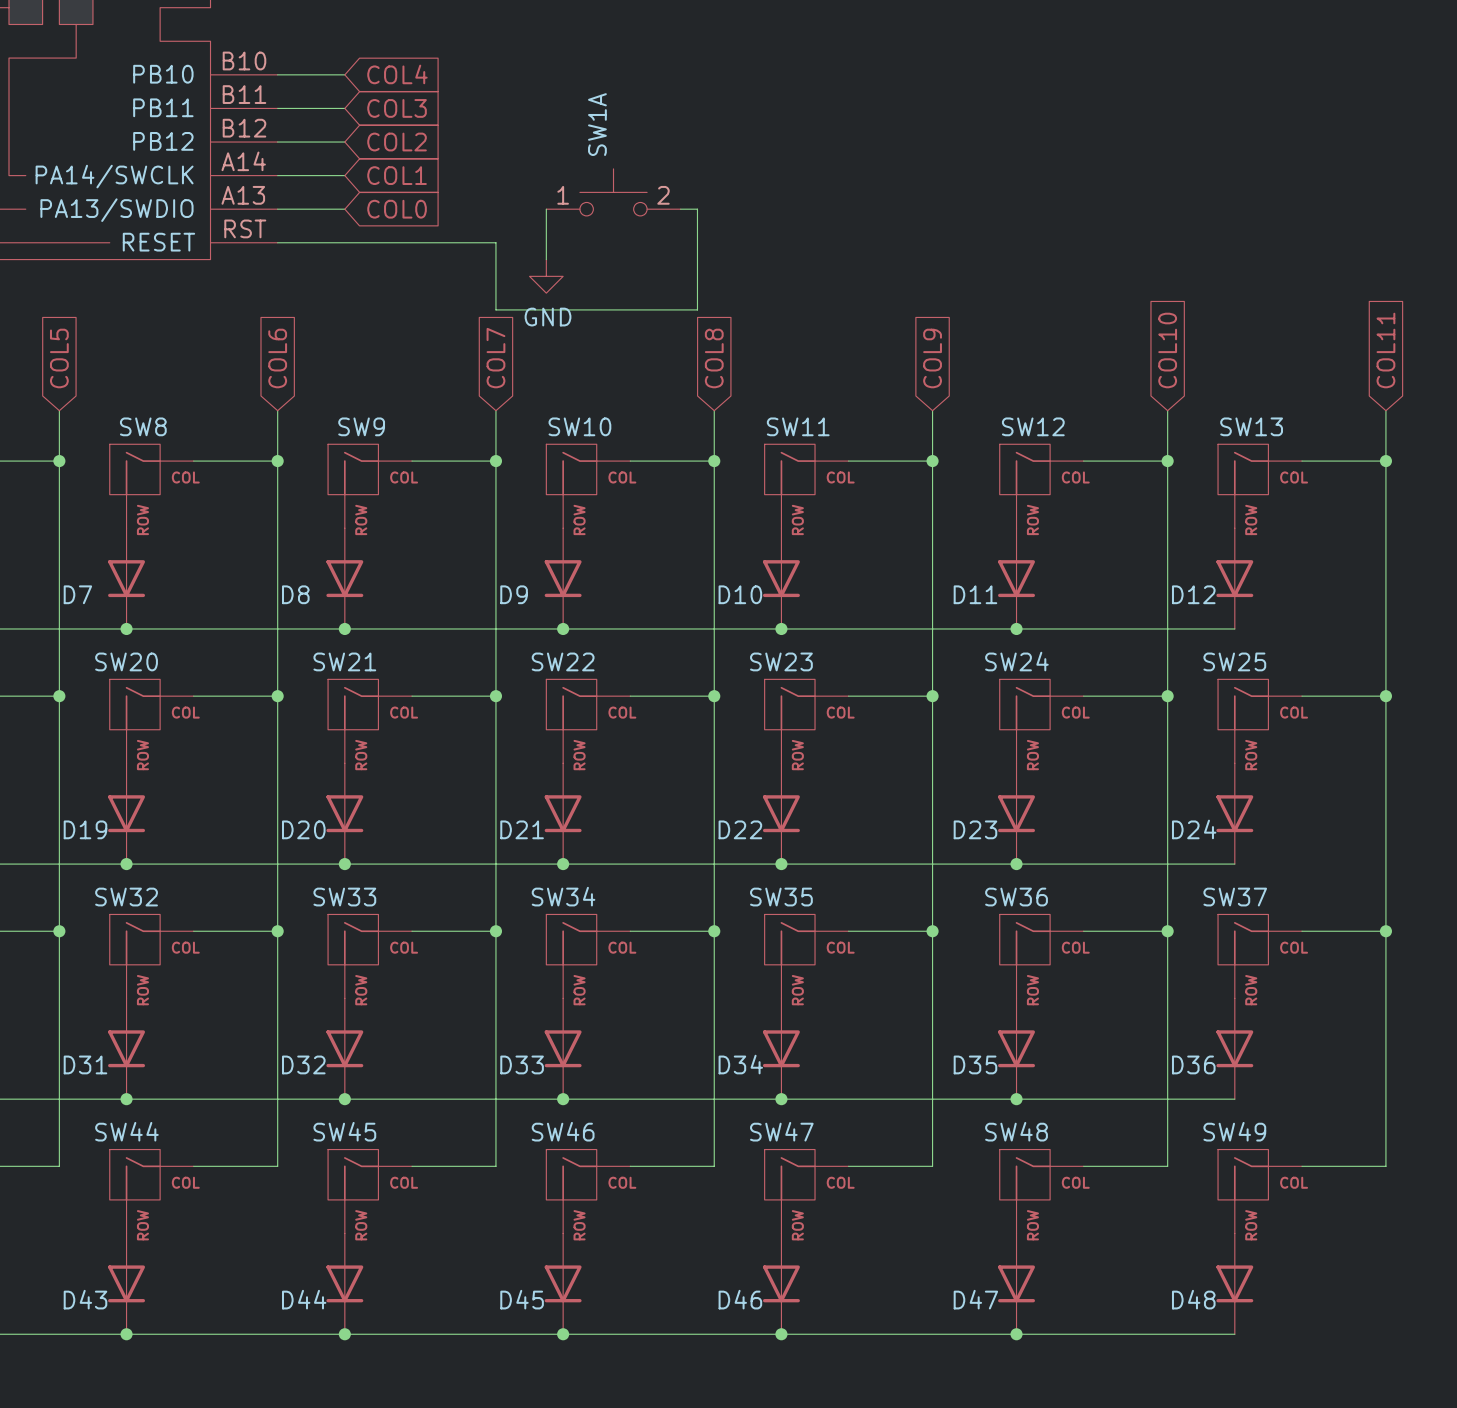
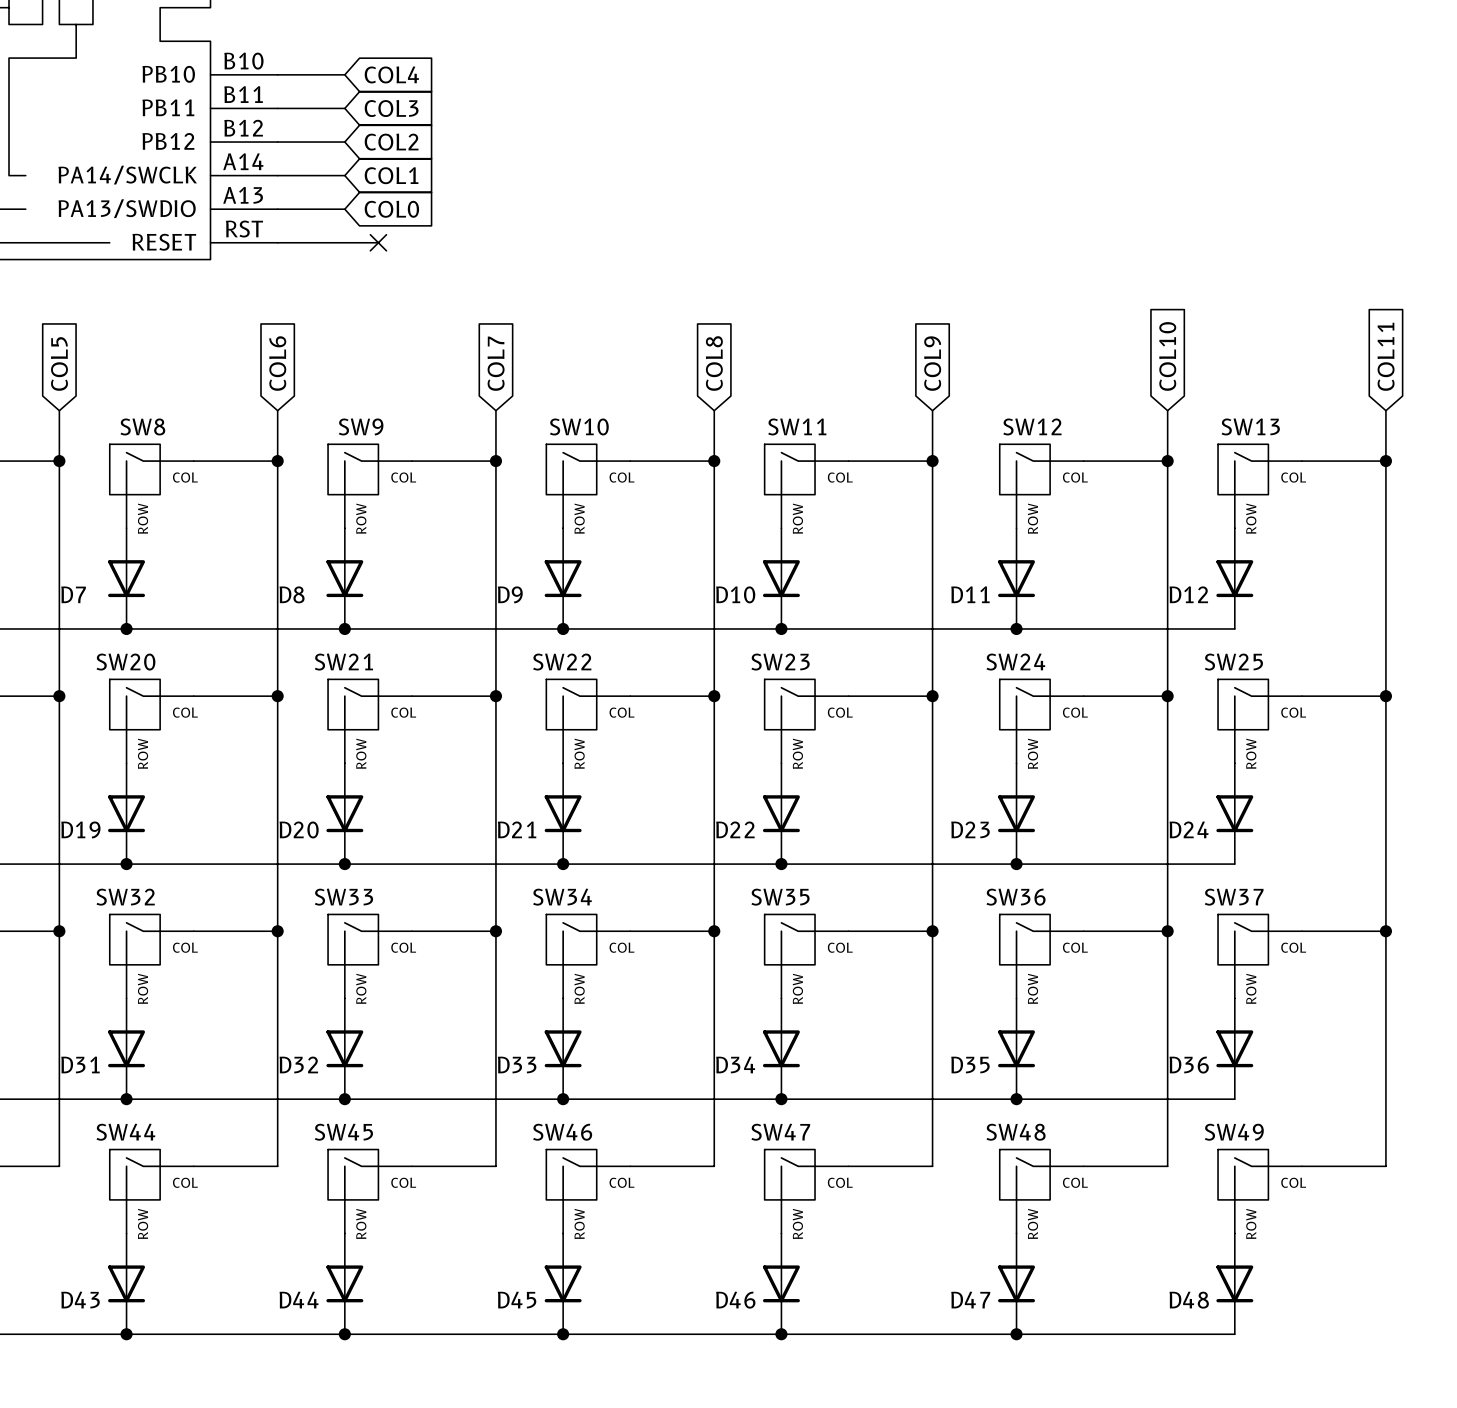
SW1A: (613, 192) -> none
wire: (546, 209) (546, 259) -> none
wire: (680, 209) (697, 209) (697, 309) (495, 309) (495, 242) (378, 242) -> none
no-connect mark: none -> (378, 242)
power symbol: GND (546, 276) -> none

